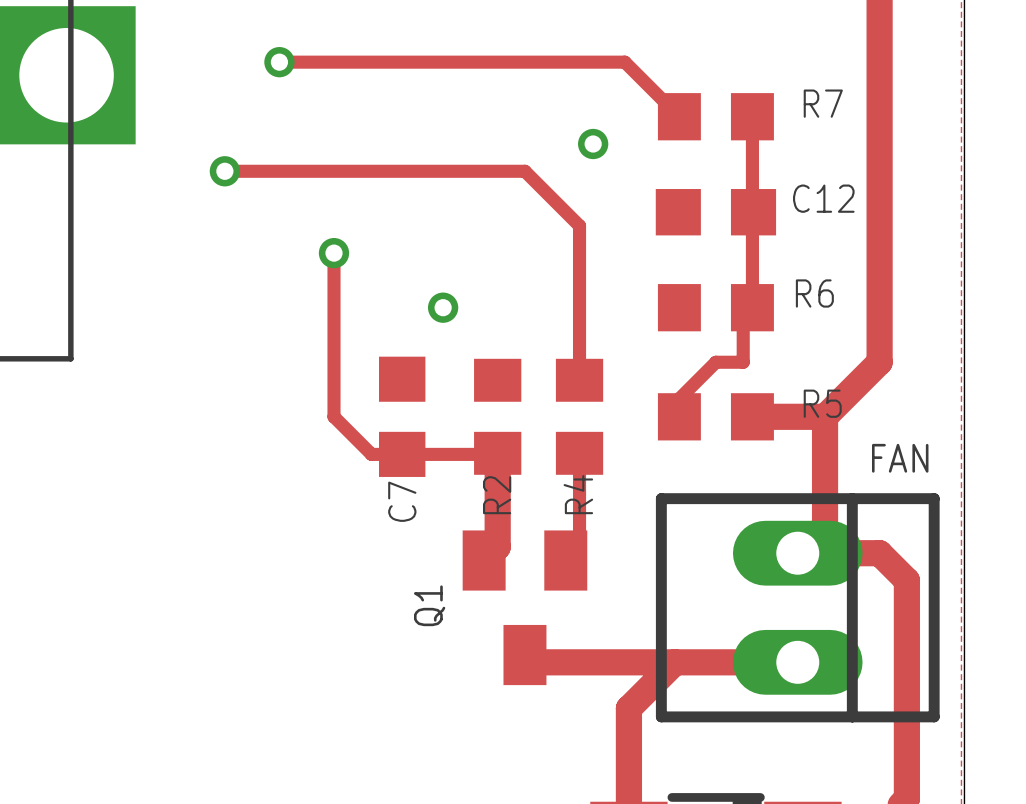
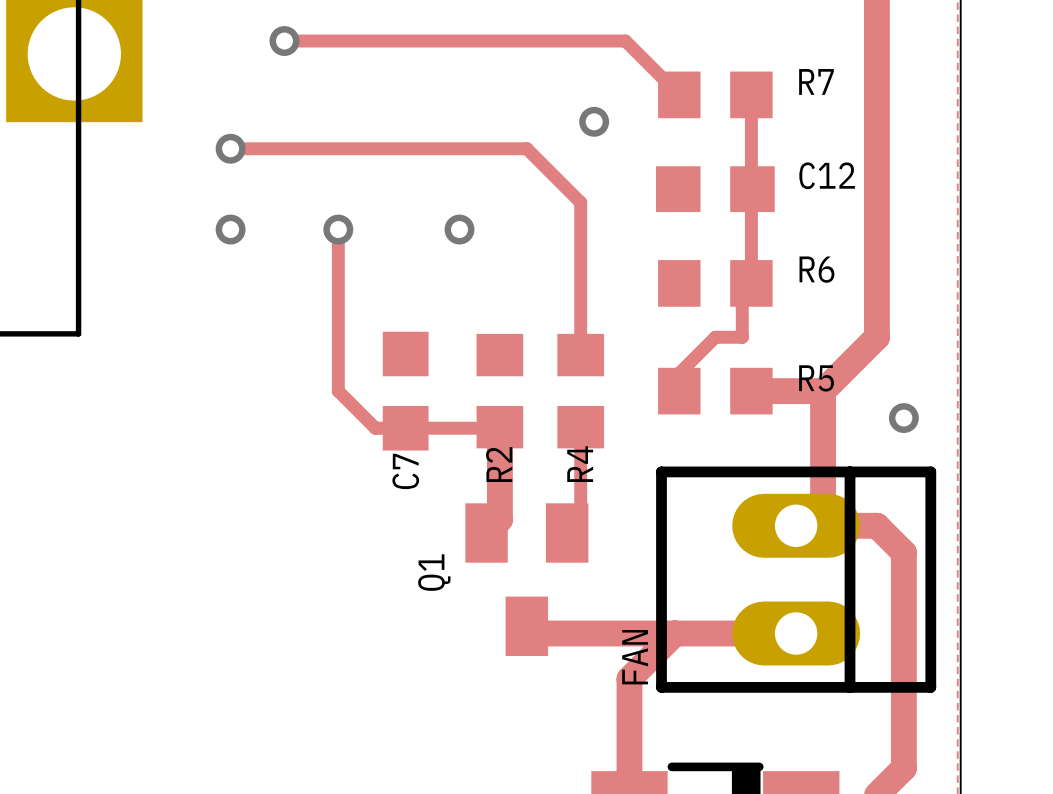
via: none -> (230, 229)
via position: (443, 307) -> (459, 229)
via: none -> (903, 418)
FAN name rotation: 0° (900, 458) -> 90° counterclockwise (635, 657)
FAN name position: FAN (900, 458) -> FAN (635, 657)

